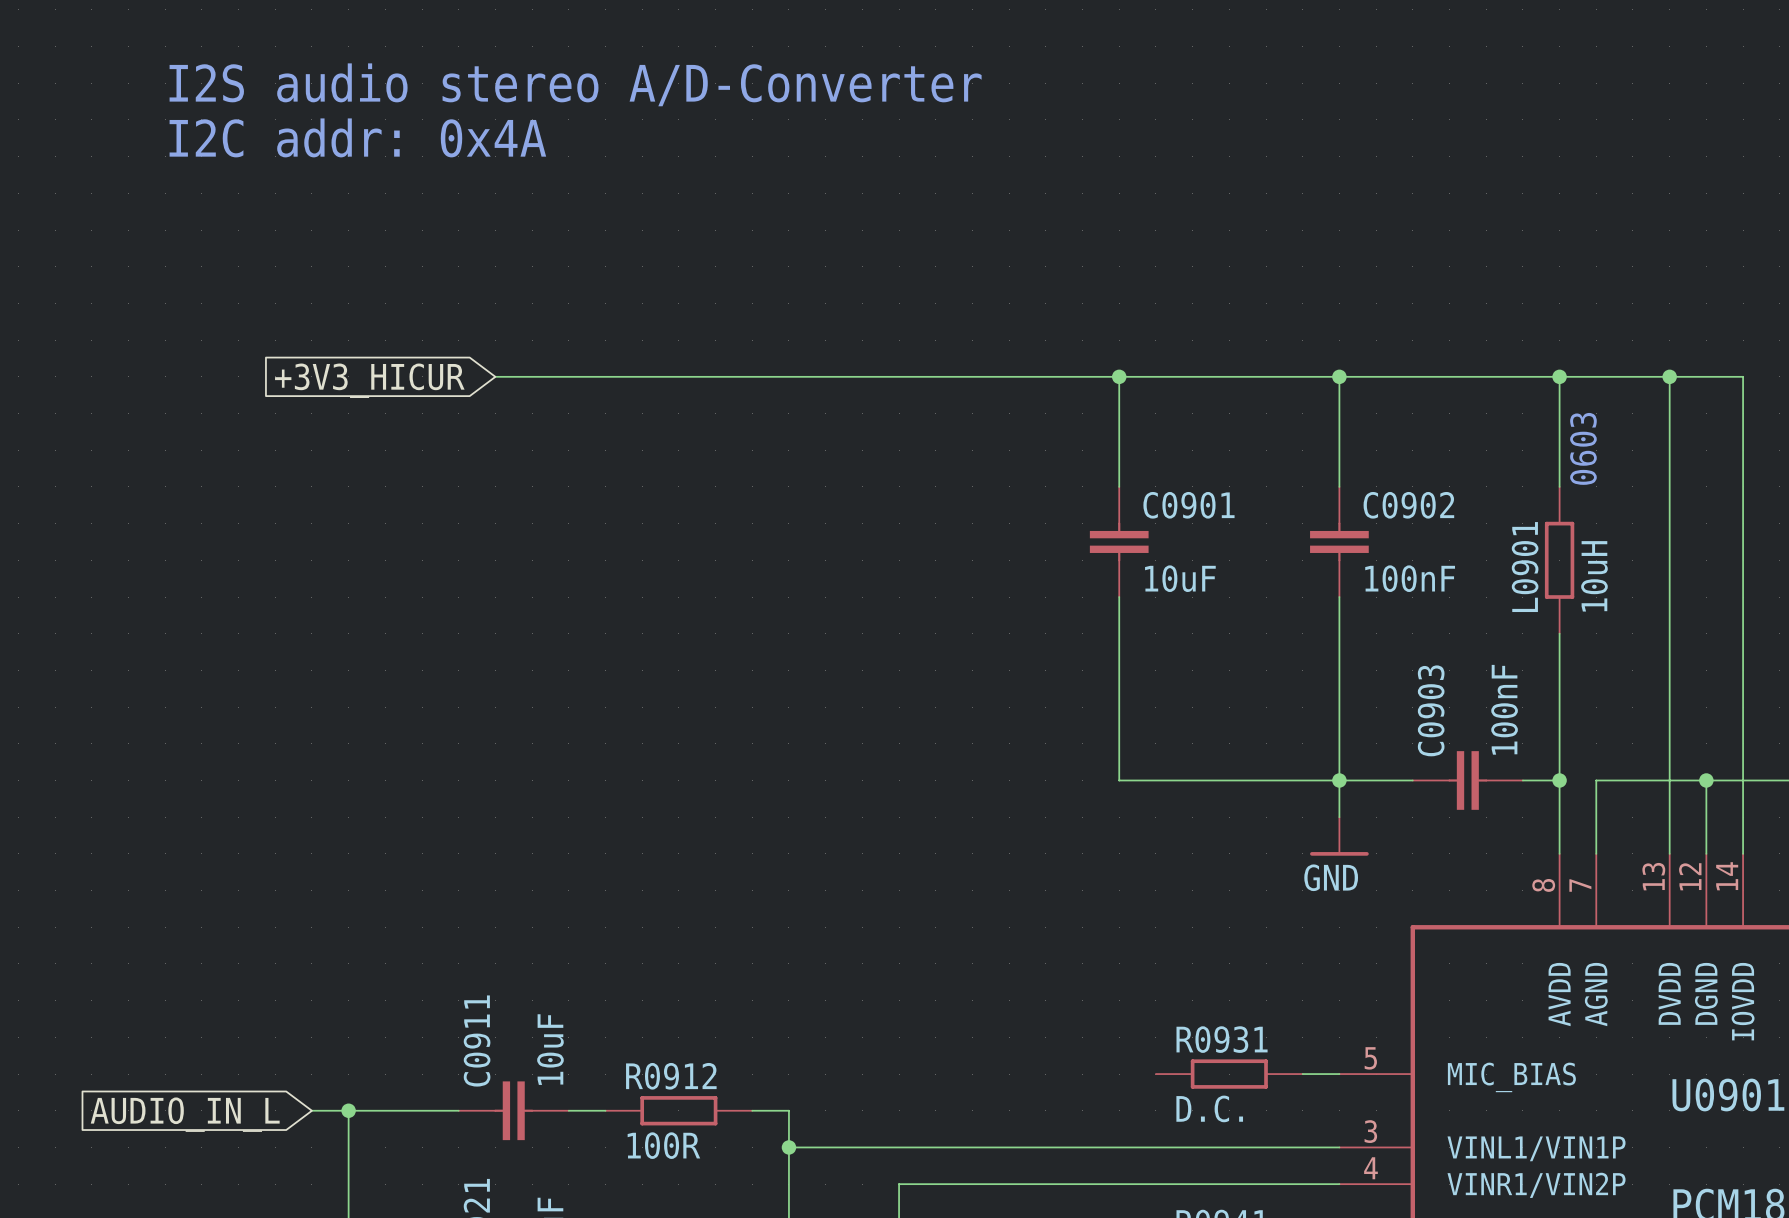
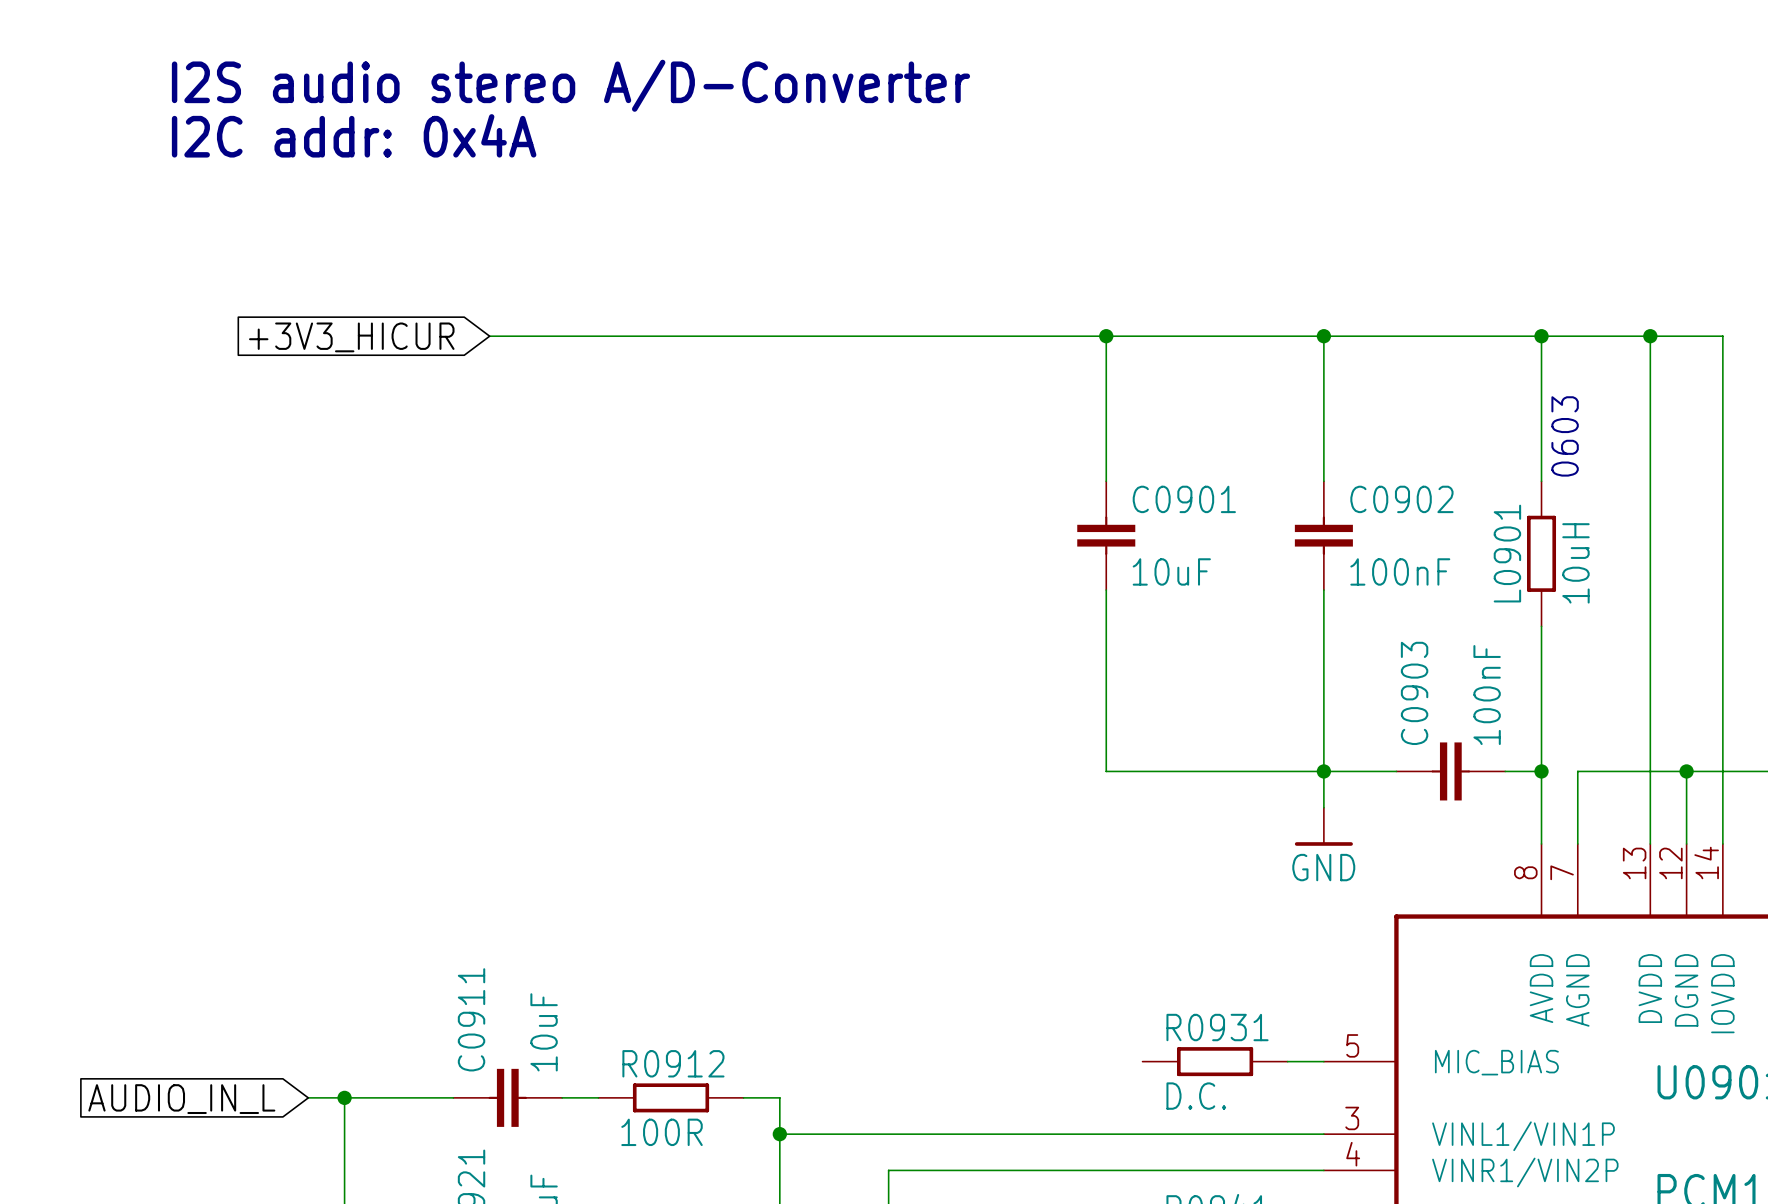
wire: none -> (1106, 336) (1106, 372)
wire: none -> (1323, 336) (1323, 372)
wire: none -> (1541, 336) (1541, 372)
wire: none -> (1650, 336) (1650, 372)
wire: (495, 376) (1743, 376) -> (489, 336) (1722, 336) (1722, 372)
junction position: (1119, 376) -> (1106, 336)
junction position: (1339, 376) -> (1323, 336)
junction position: (1559, 376) -> (1541, 336)
junction position: (1669, 376) -> (1650, 336)
global label position: +3V3_HICUR (369, 380) -> +3V3_HICUR (351, 337)

